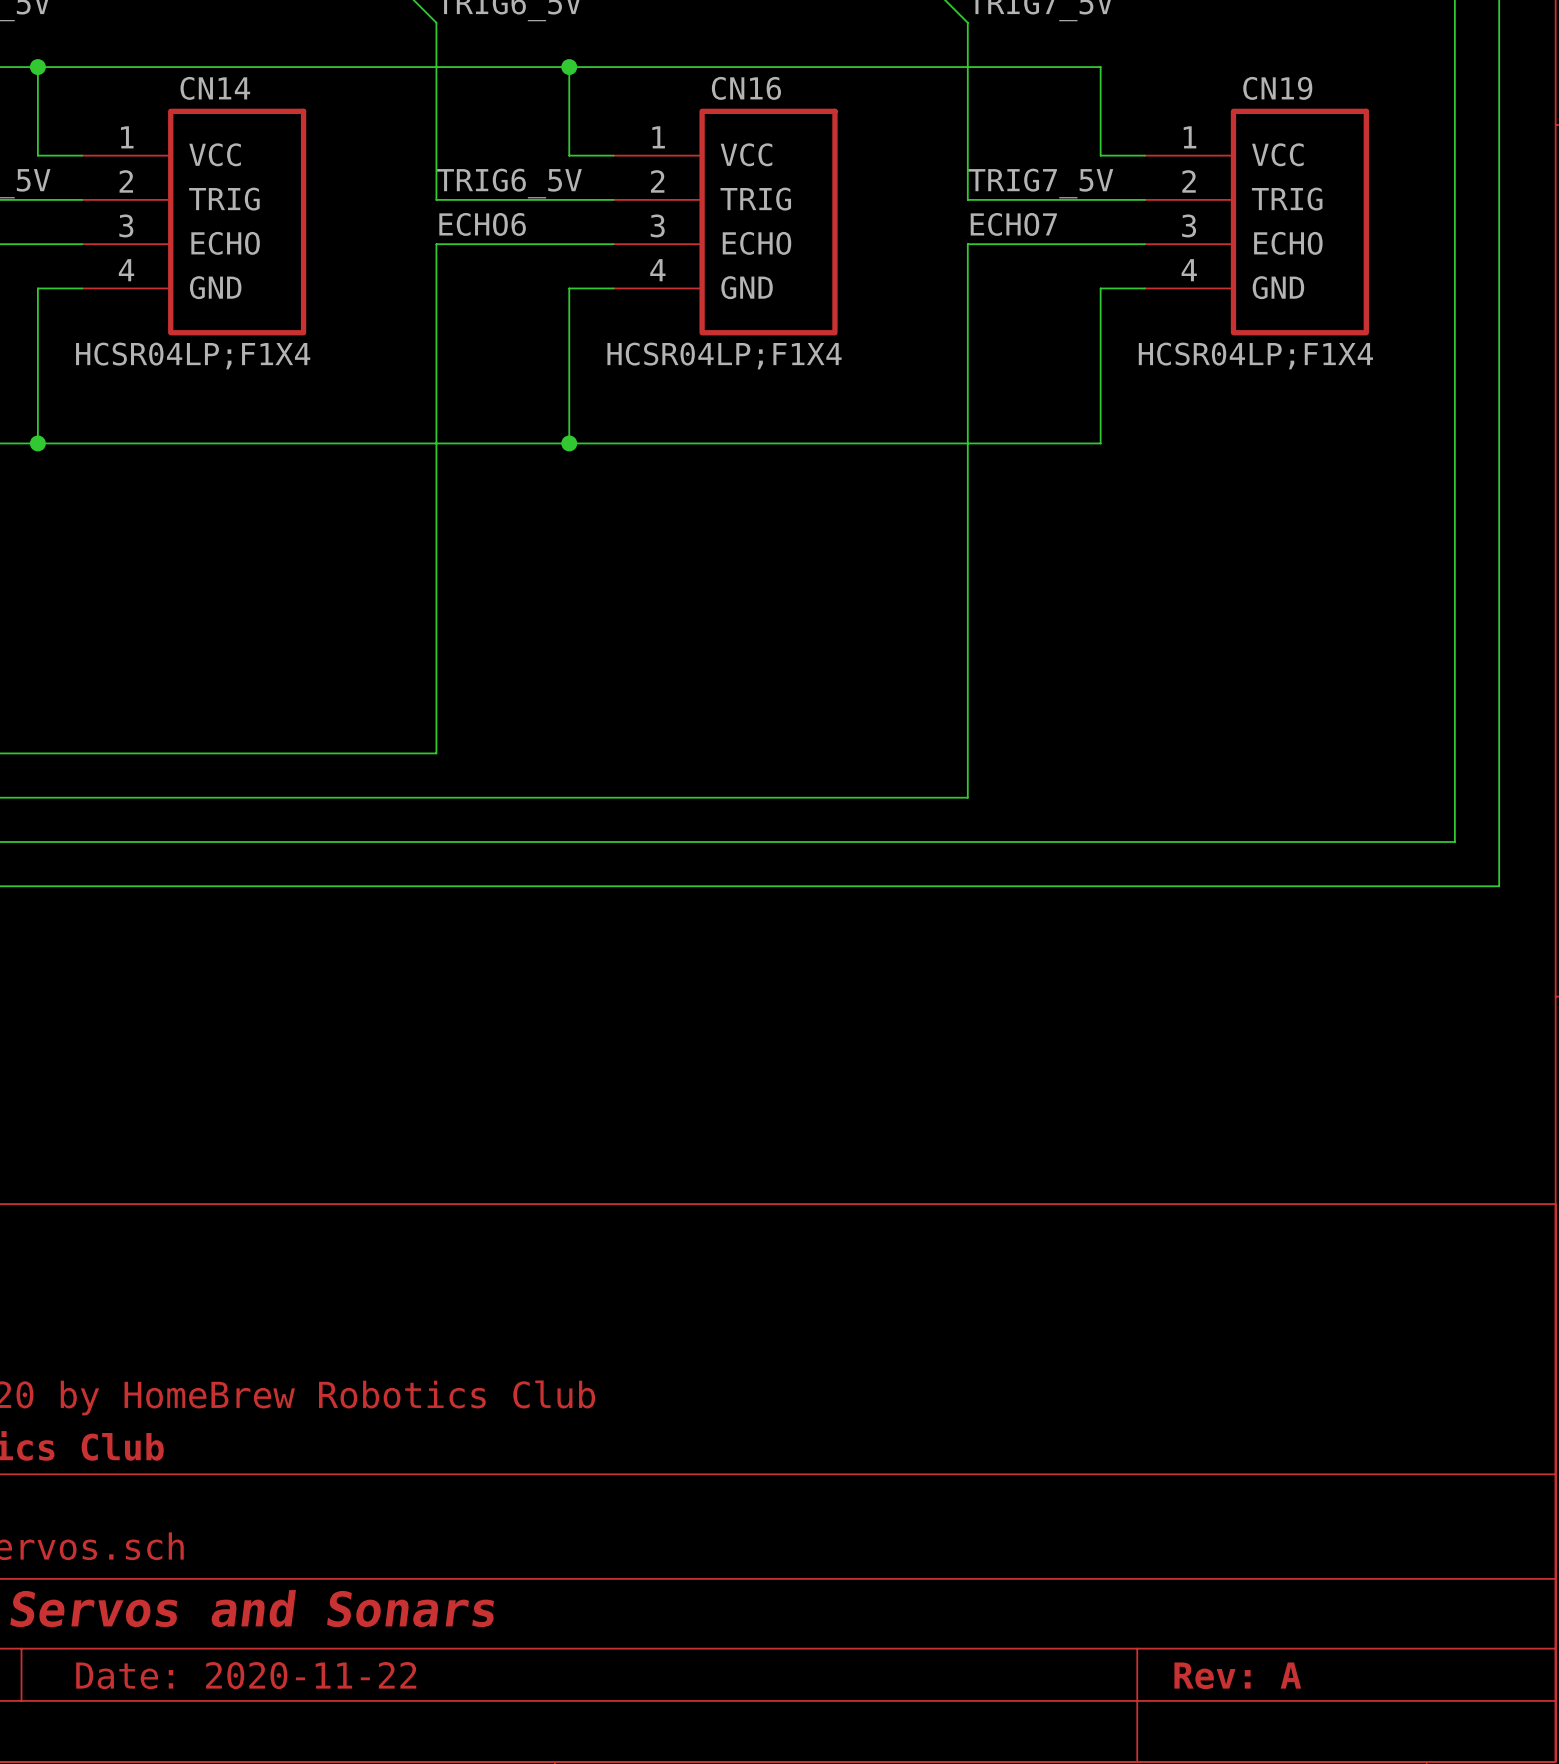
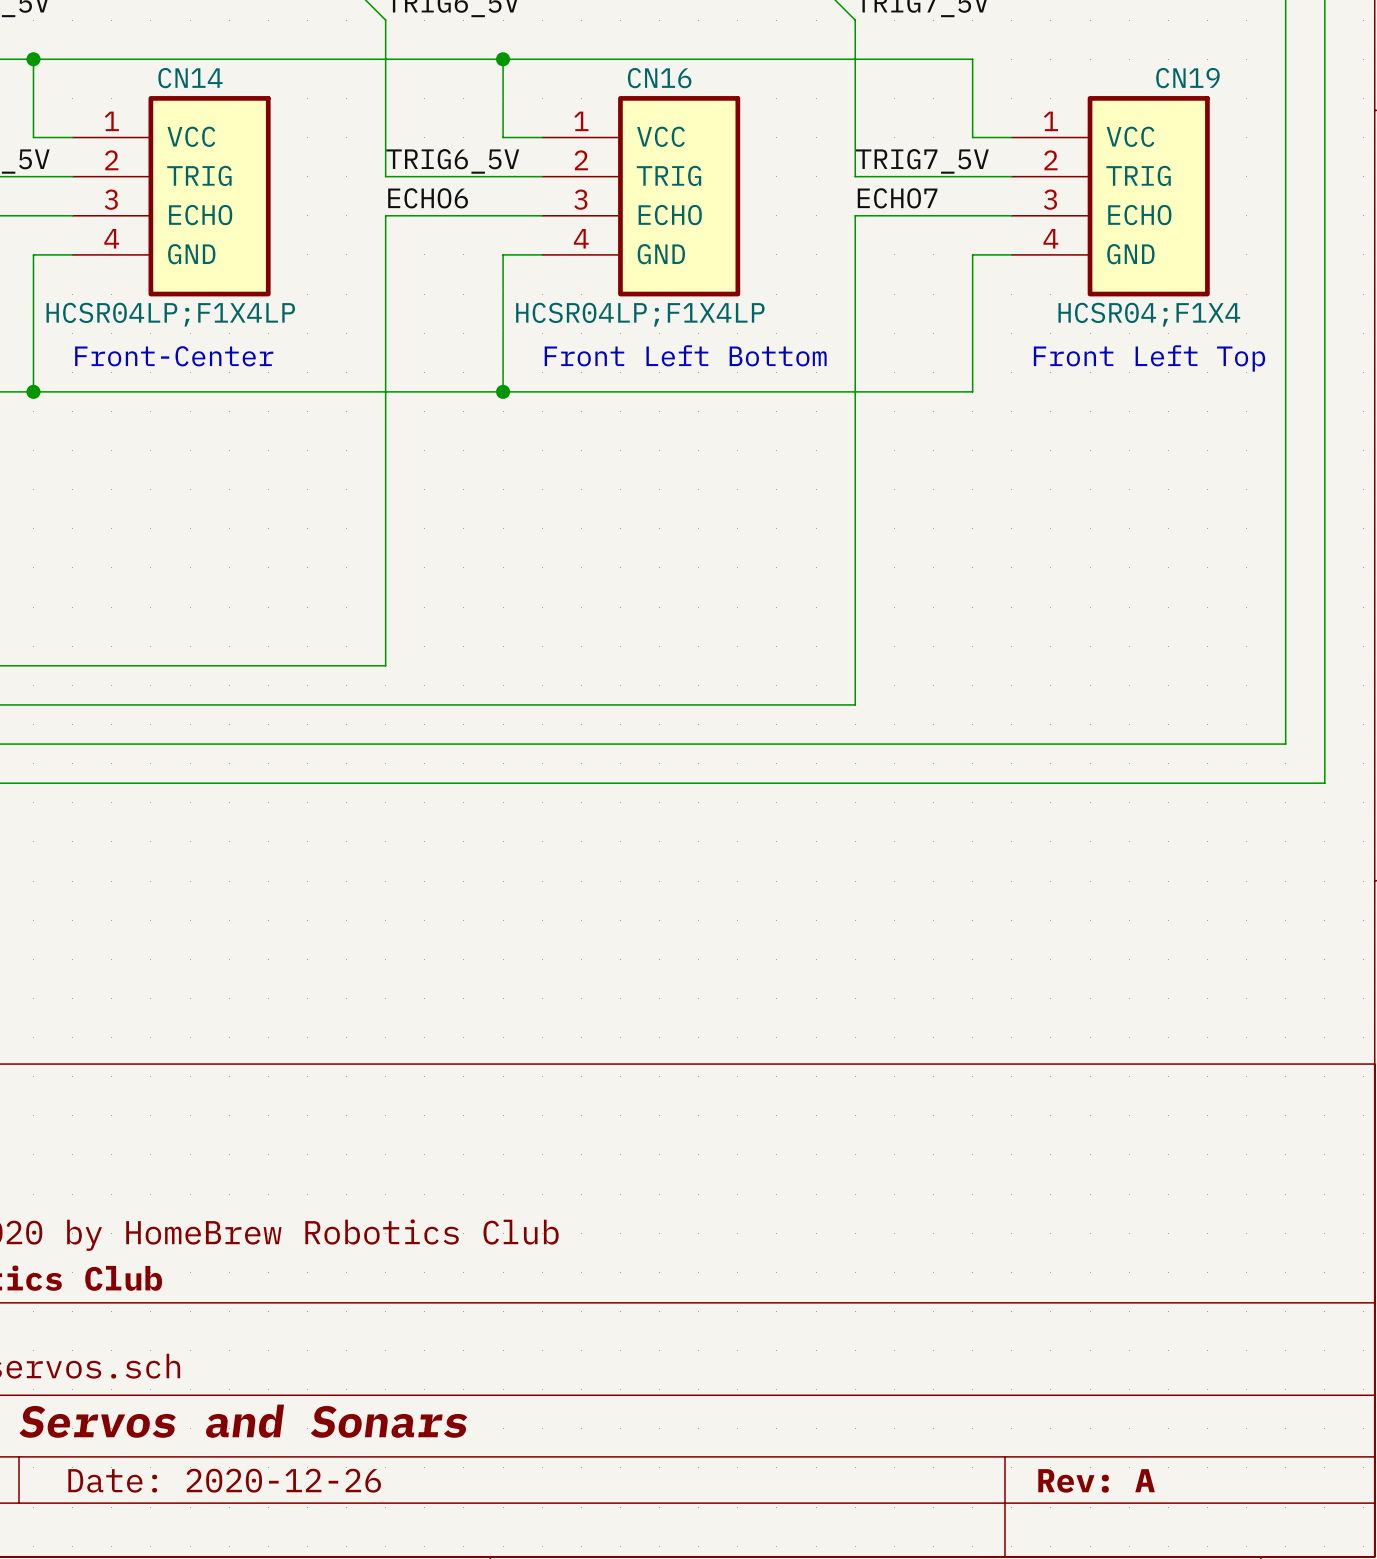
CN19 name position: CN19 (1277, 88) -> CN19 (1187, 78)
CN14 value: HCSR04LP;F1X4 (193, 355) -> HCSR04LP;F1X4LP (170, 314)
CN16 value: HCSR04LP;F1X4 (724, 355) -> HCSR04LP;F1X4LP (640, 314)
CN19 value: HCSR04LP;F1X4 (1255, 355) -> HCSR04;F1X4 (1149, 314)
text: none -> Front Left Bottom (685, 355)
text: none -> Front-Center (174, 356)
text: none -> Front Left Top (1149, 358)
title block: Date: 2020-11-22 (246, 1675) -> Date: 2020-12-26 (224, 1480)

